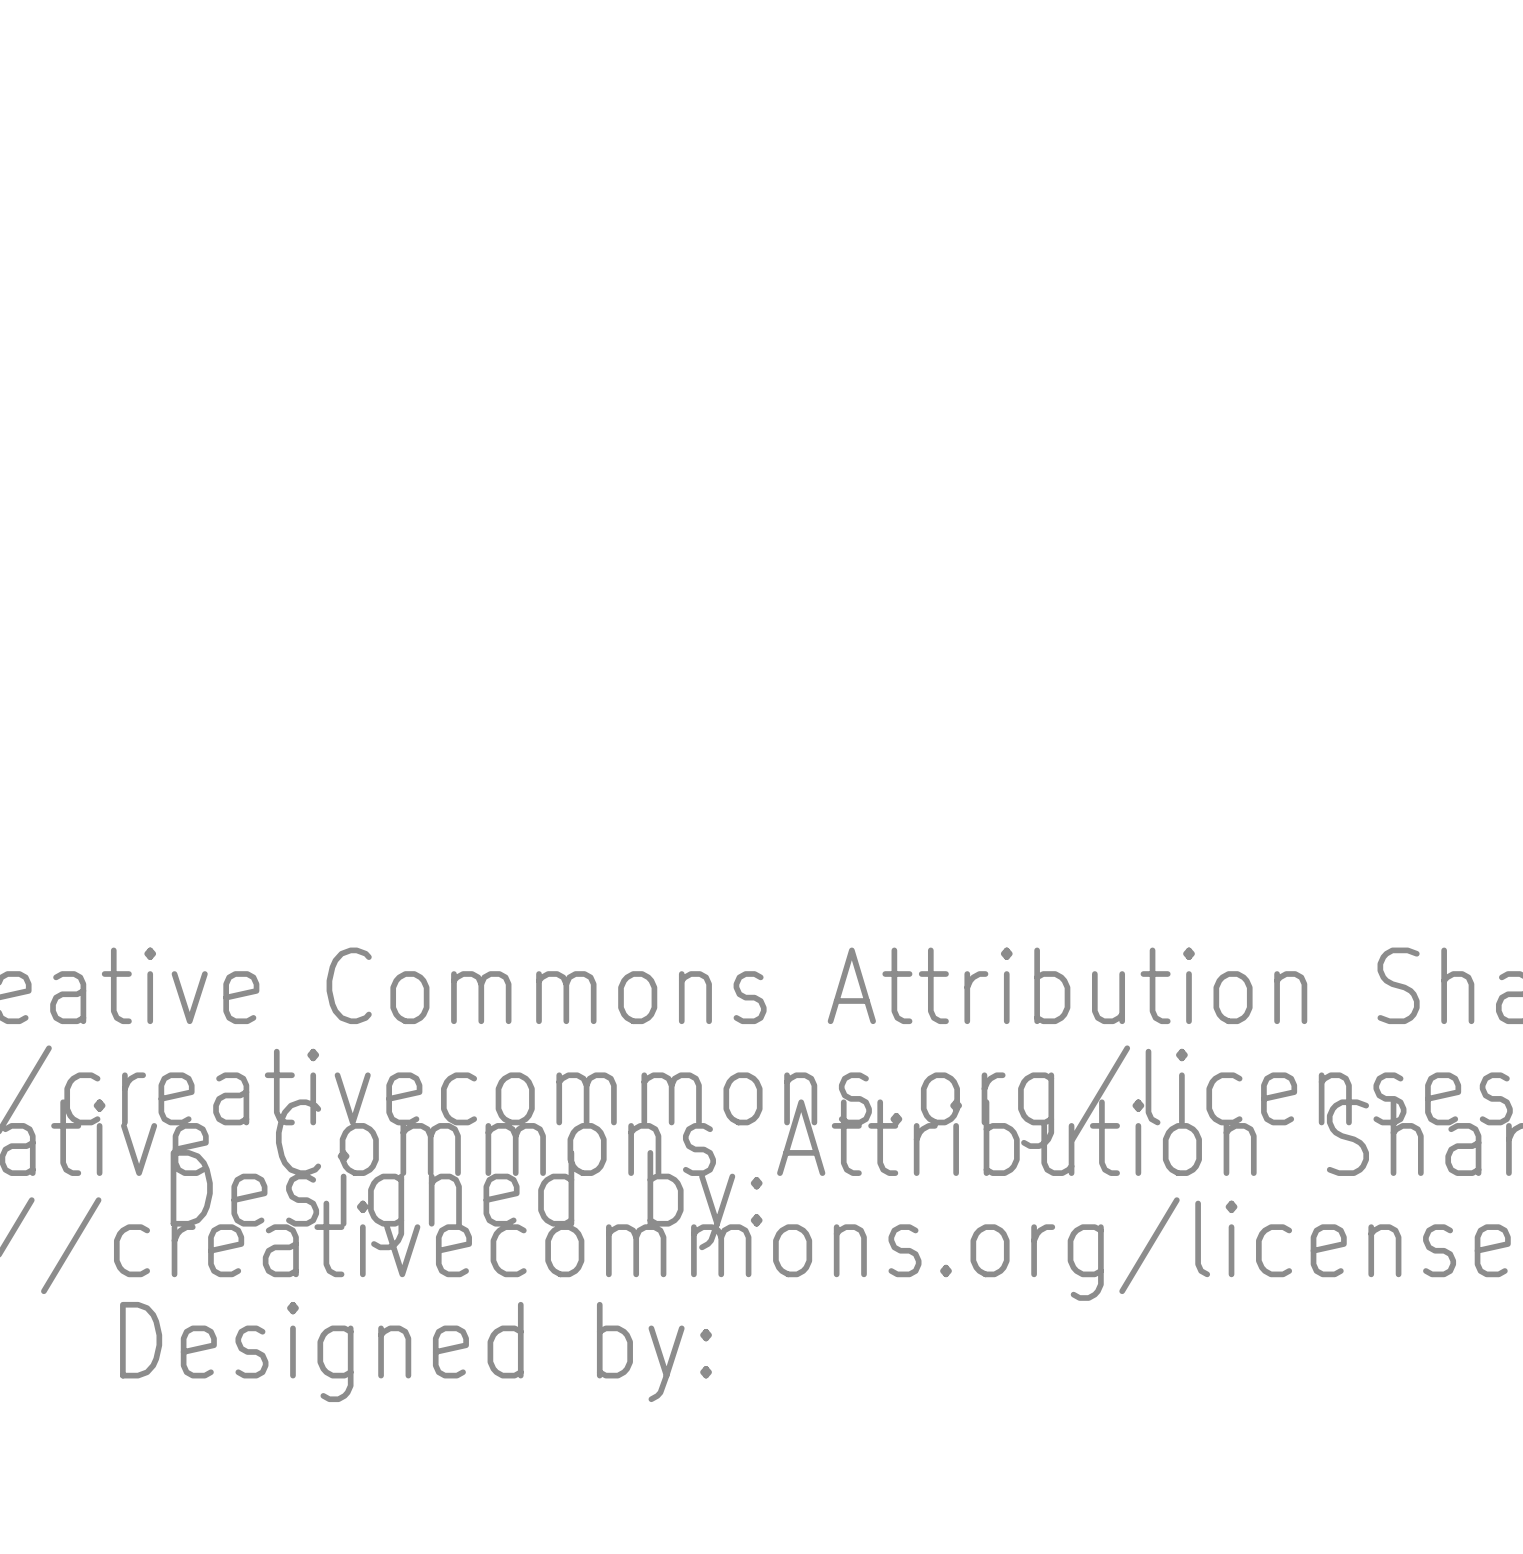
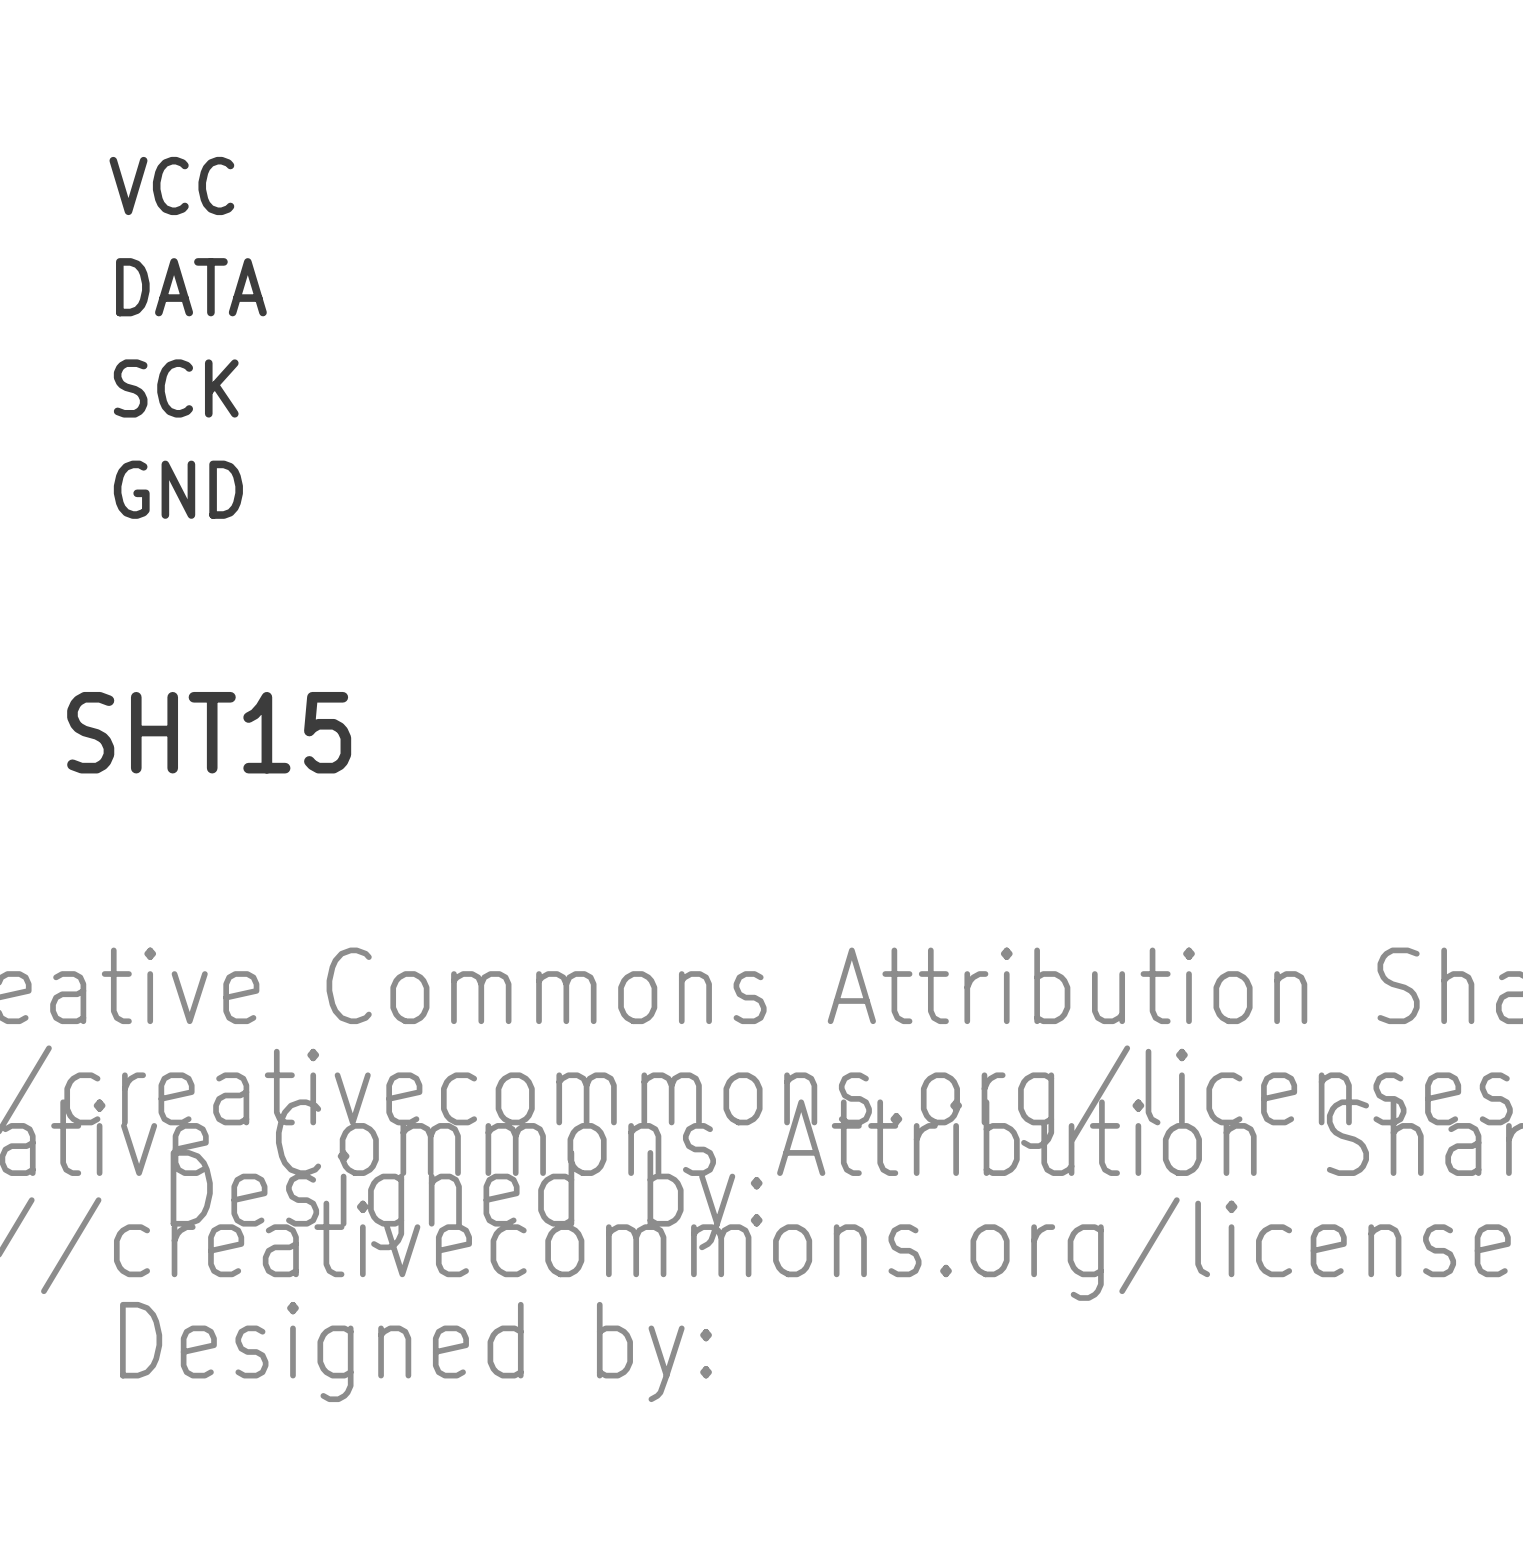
text: none -> VCC (171, 185)
text: none -> DATA (191, 287)
text: none -> SCK (176, 388)
text: none -> GND (178, 489)
text: none -> SHT15 (209, 732)

